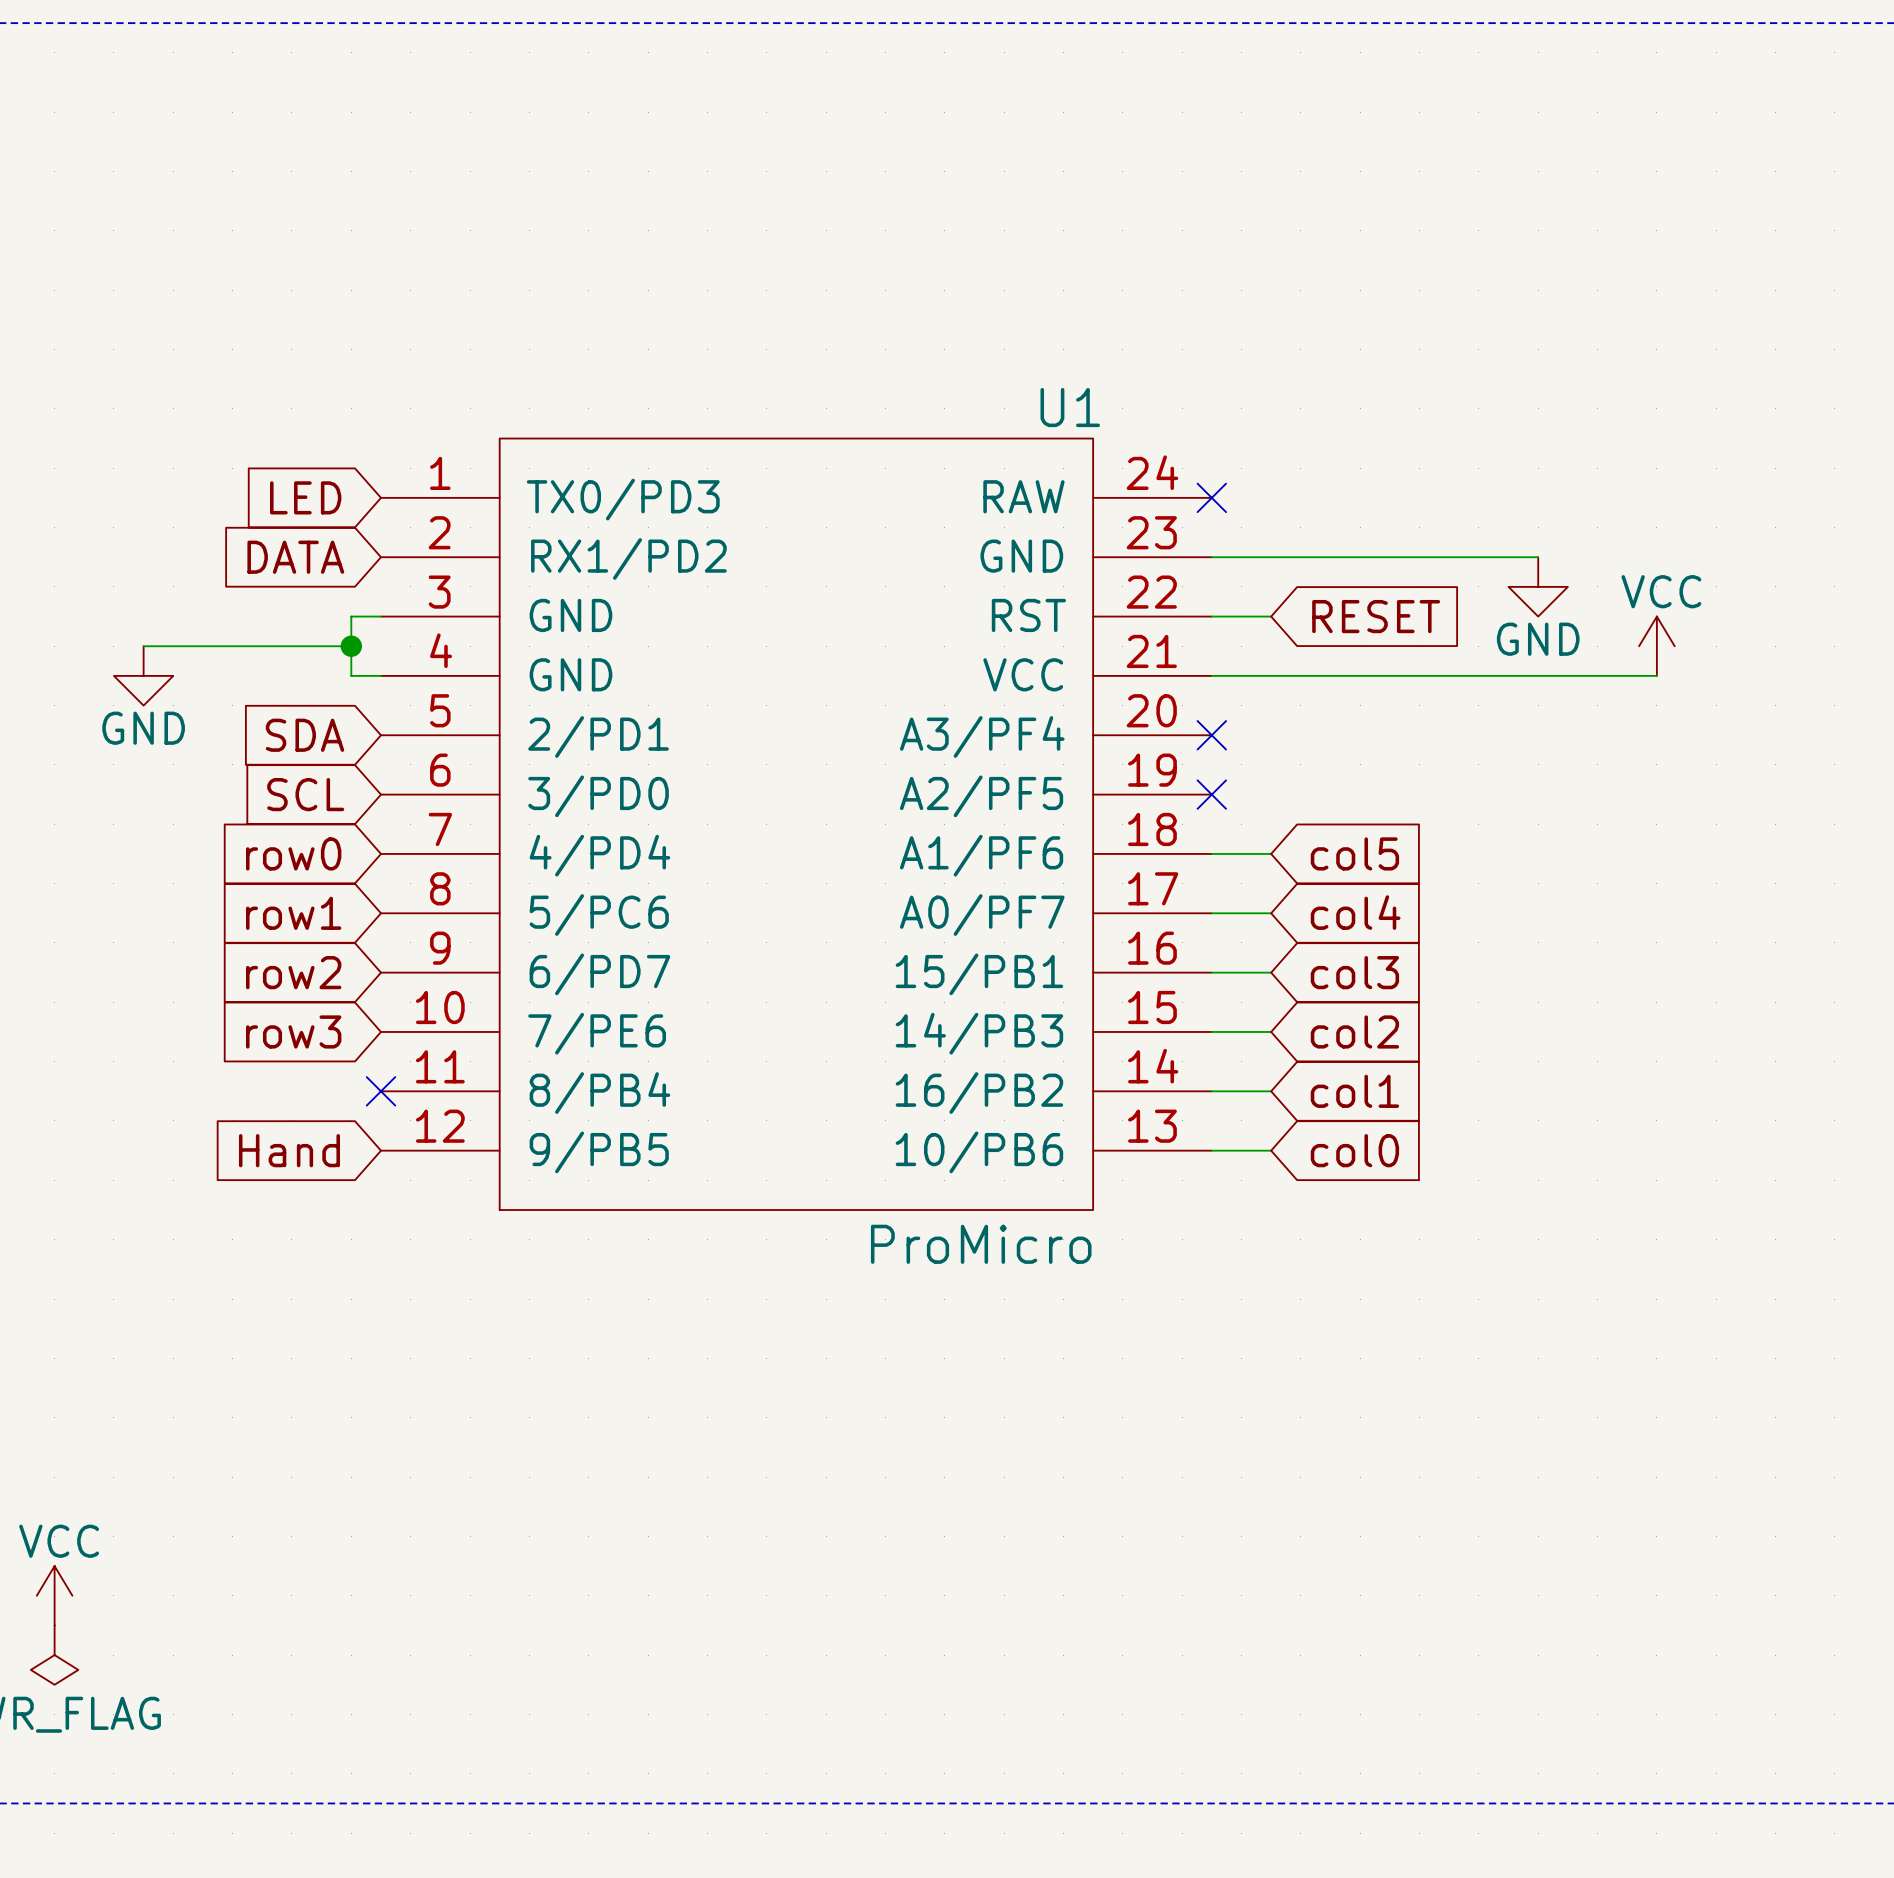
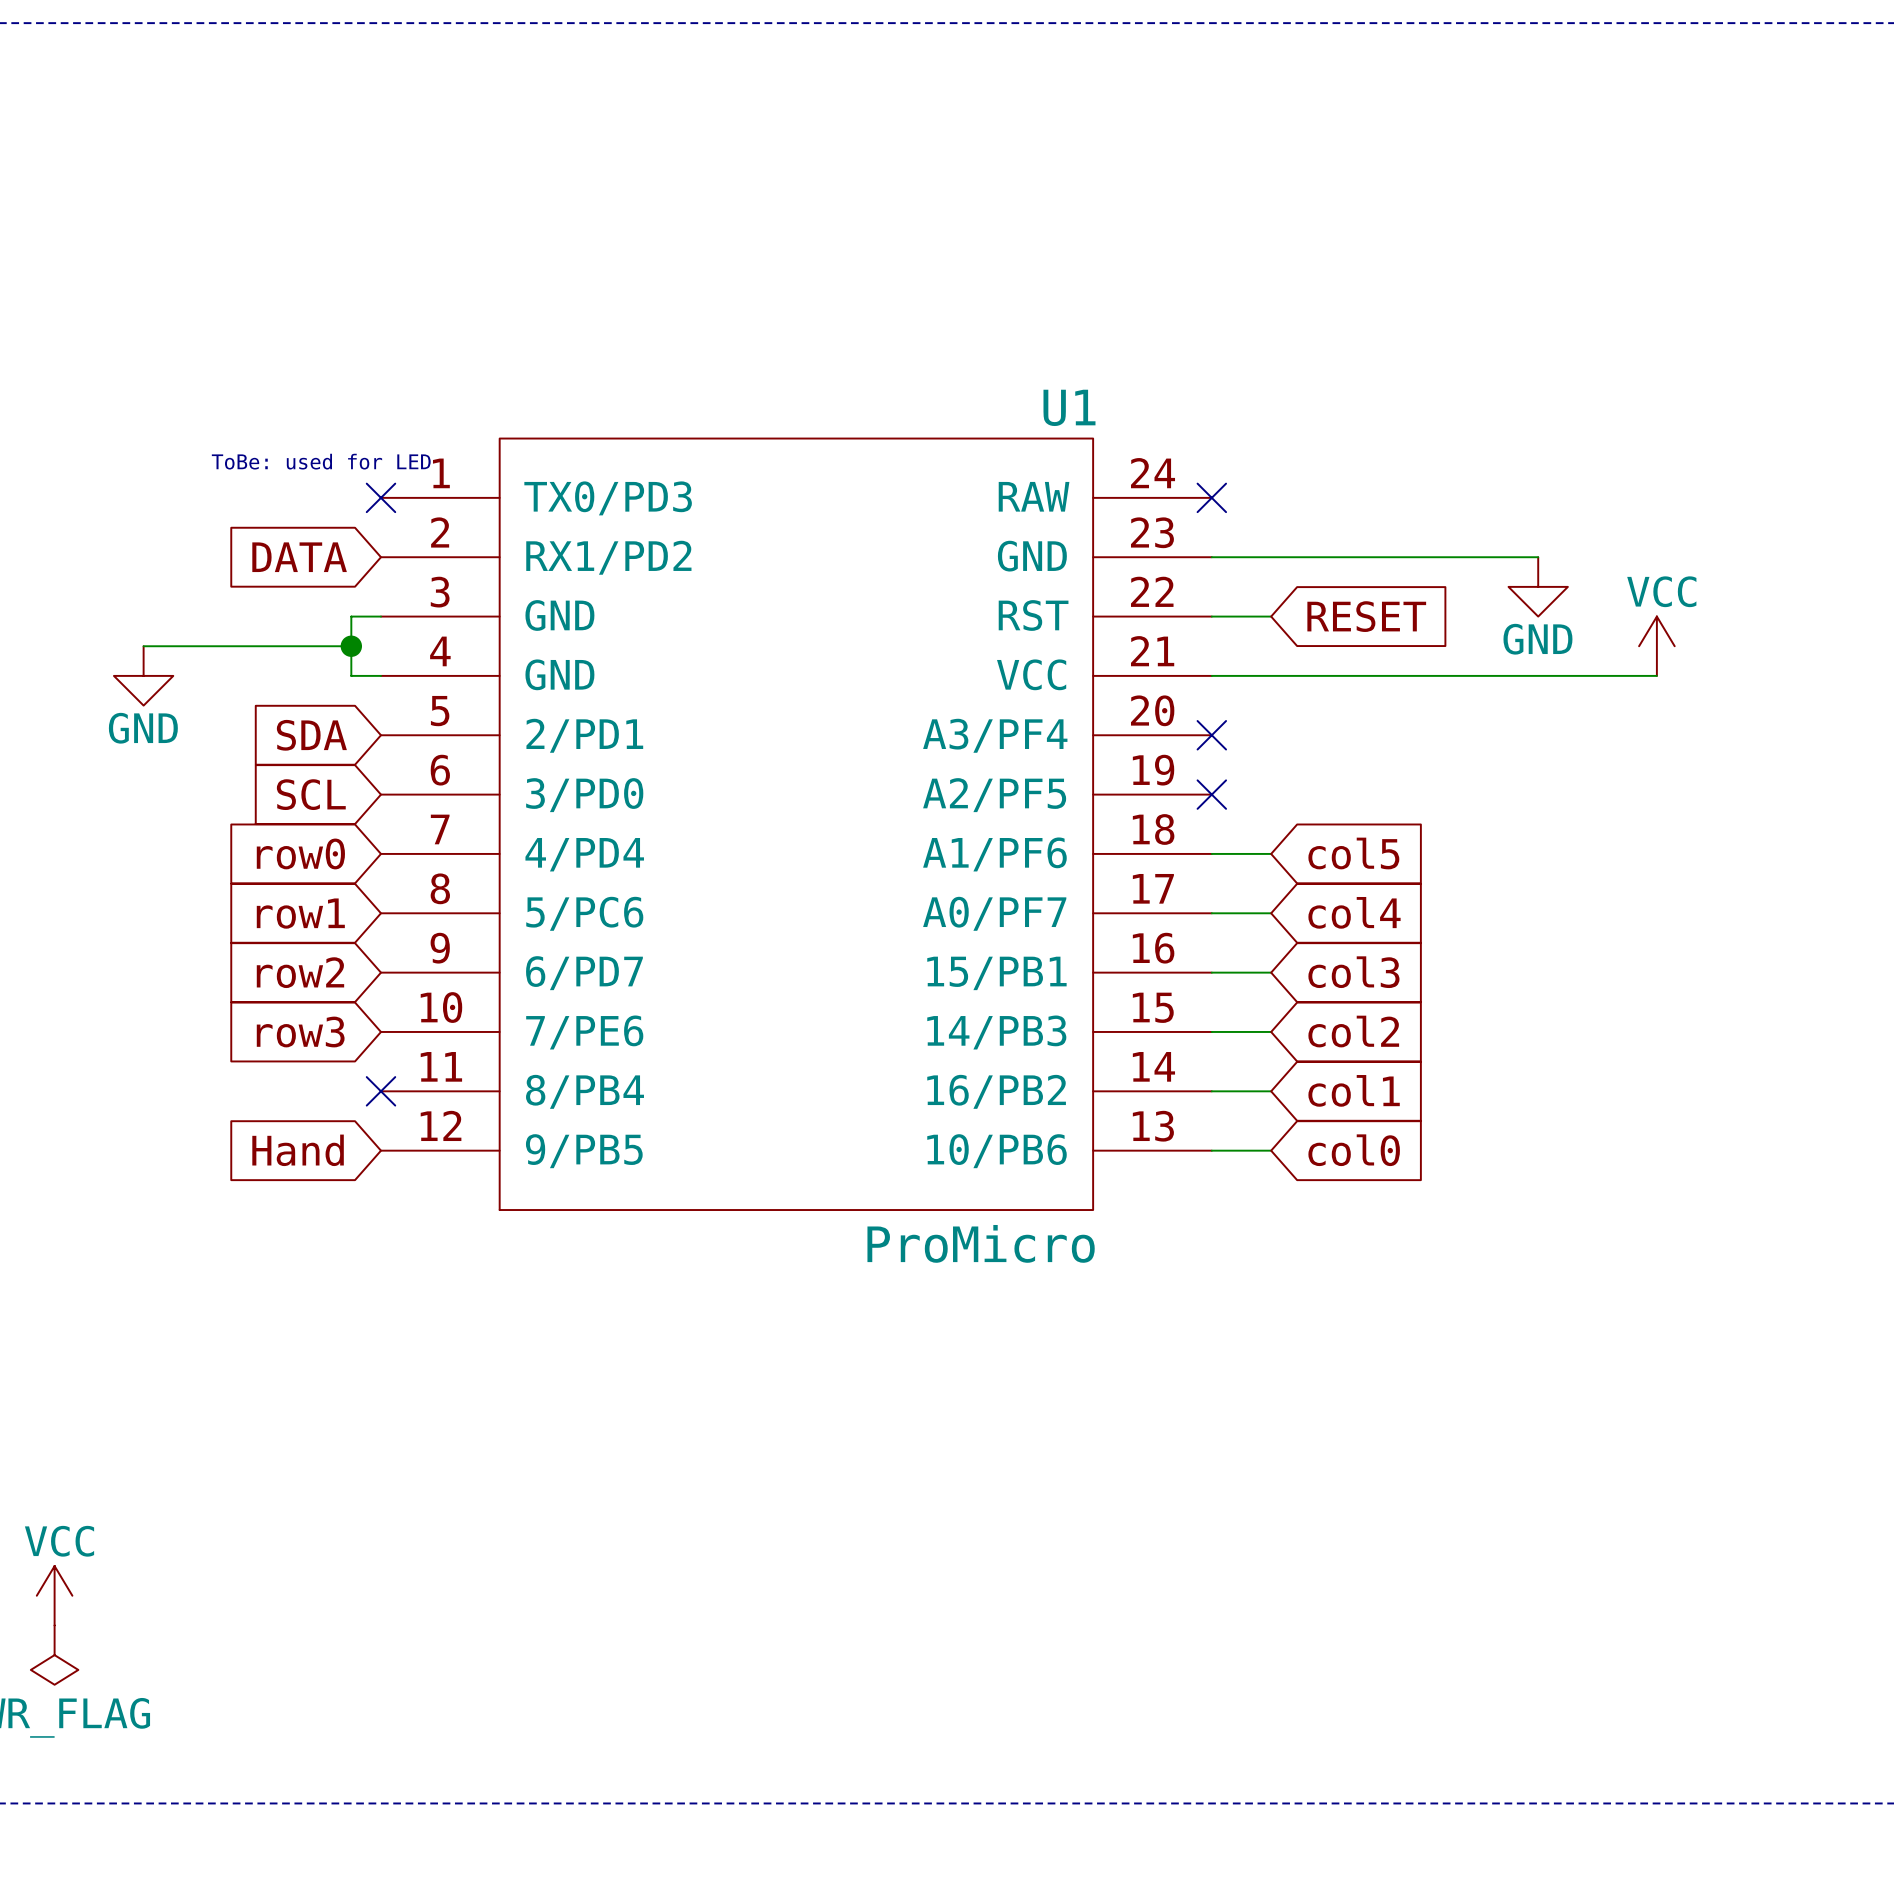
text: none -> ToBe: used for LED (321, 461)
global label: LED (305, 497) -> none
no-connect mark: none -> (380, 497)

